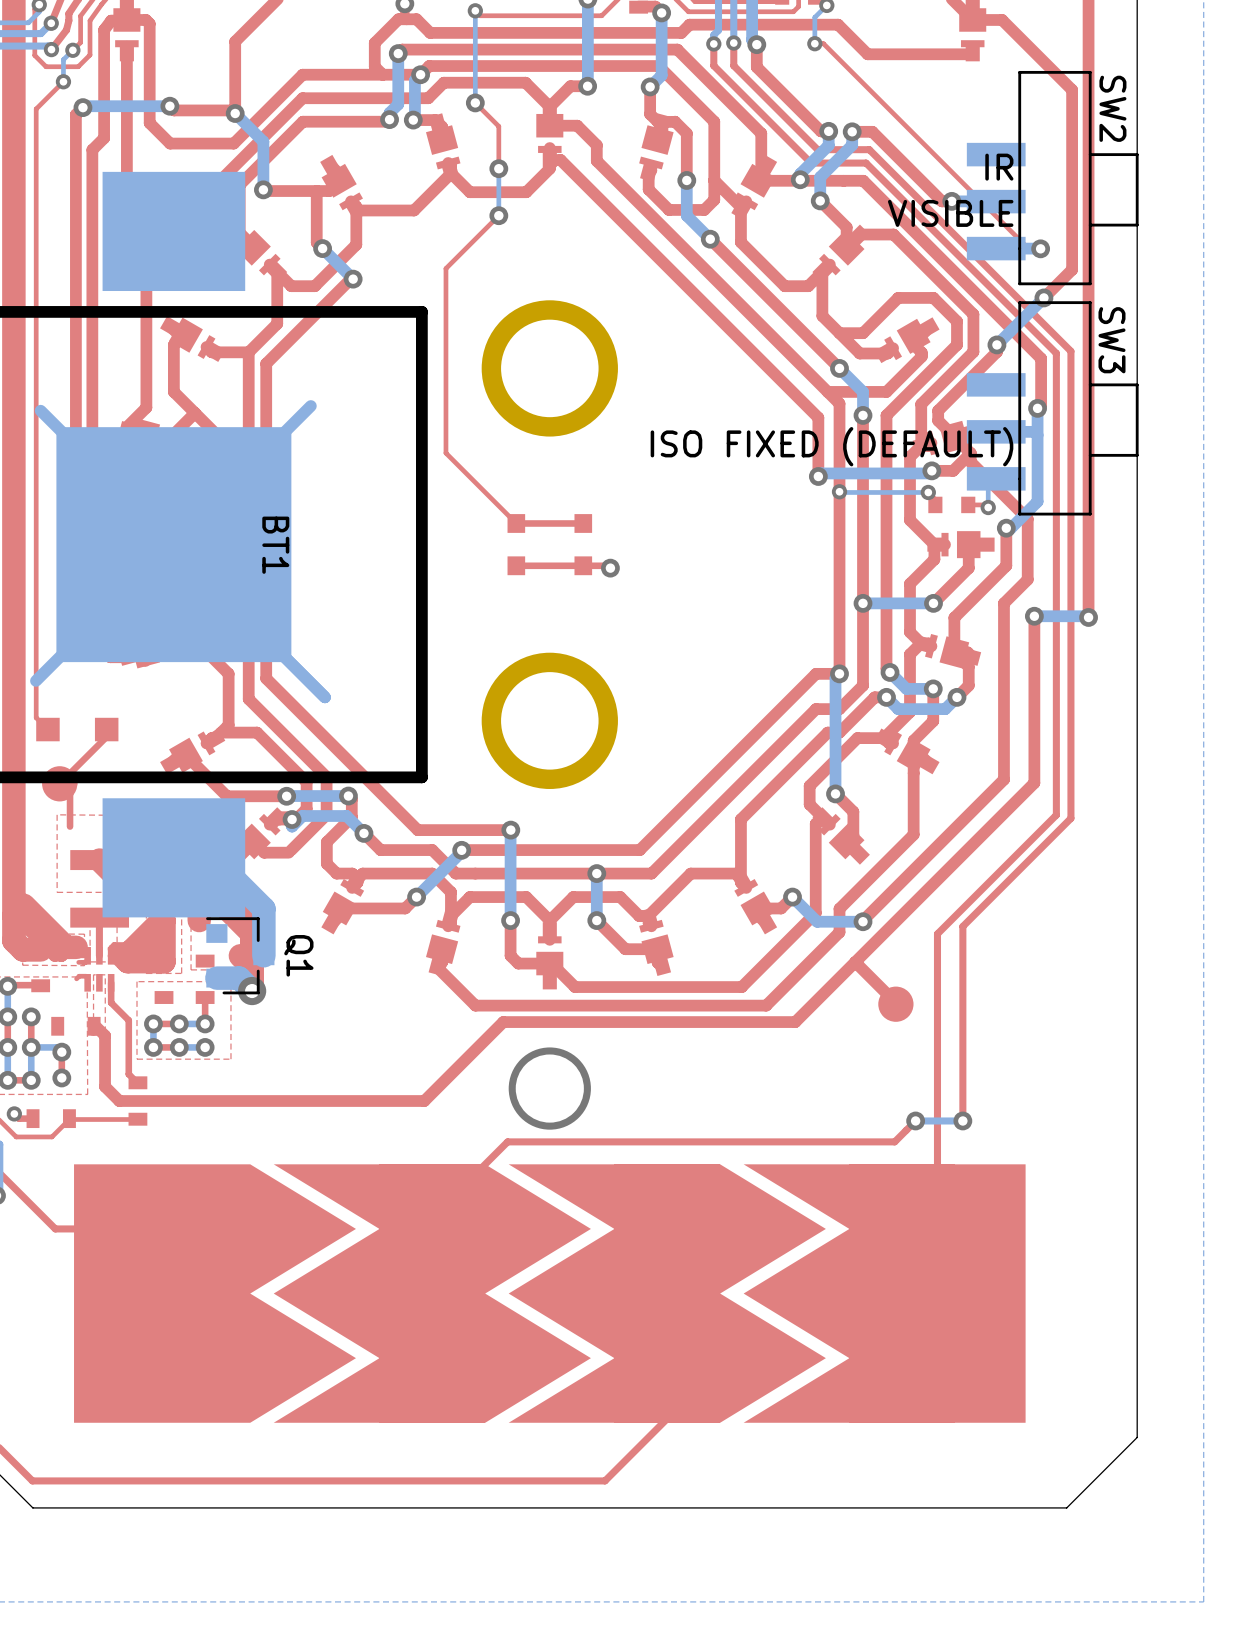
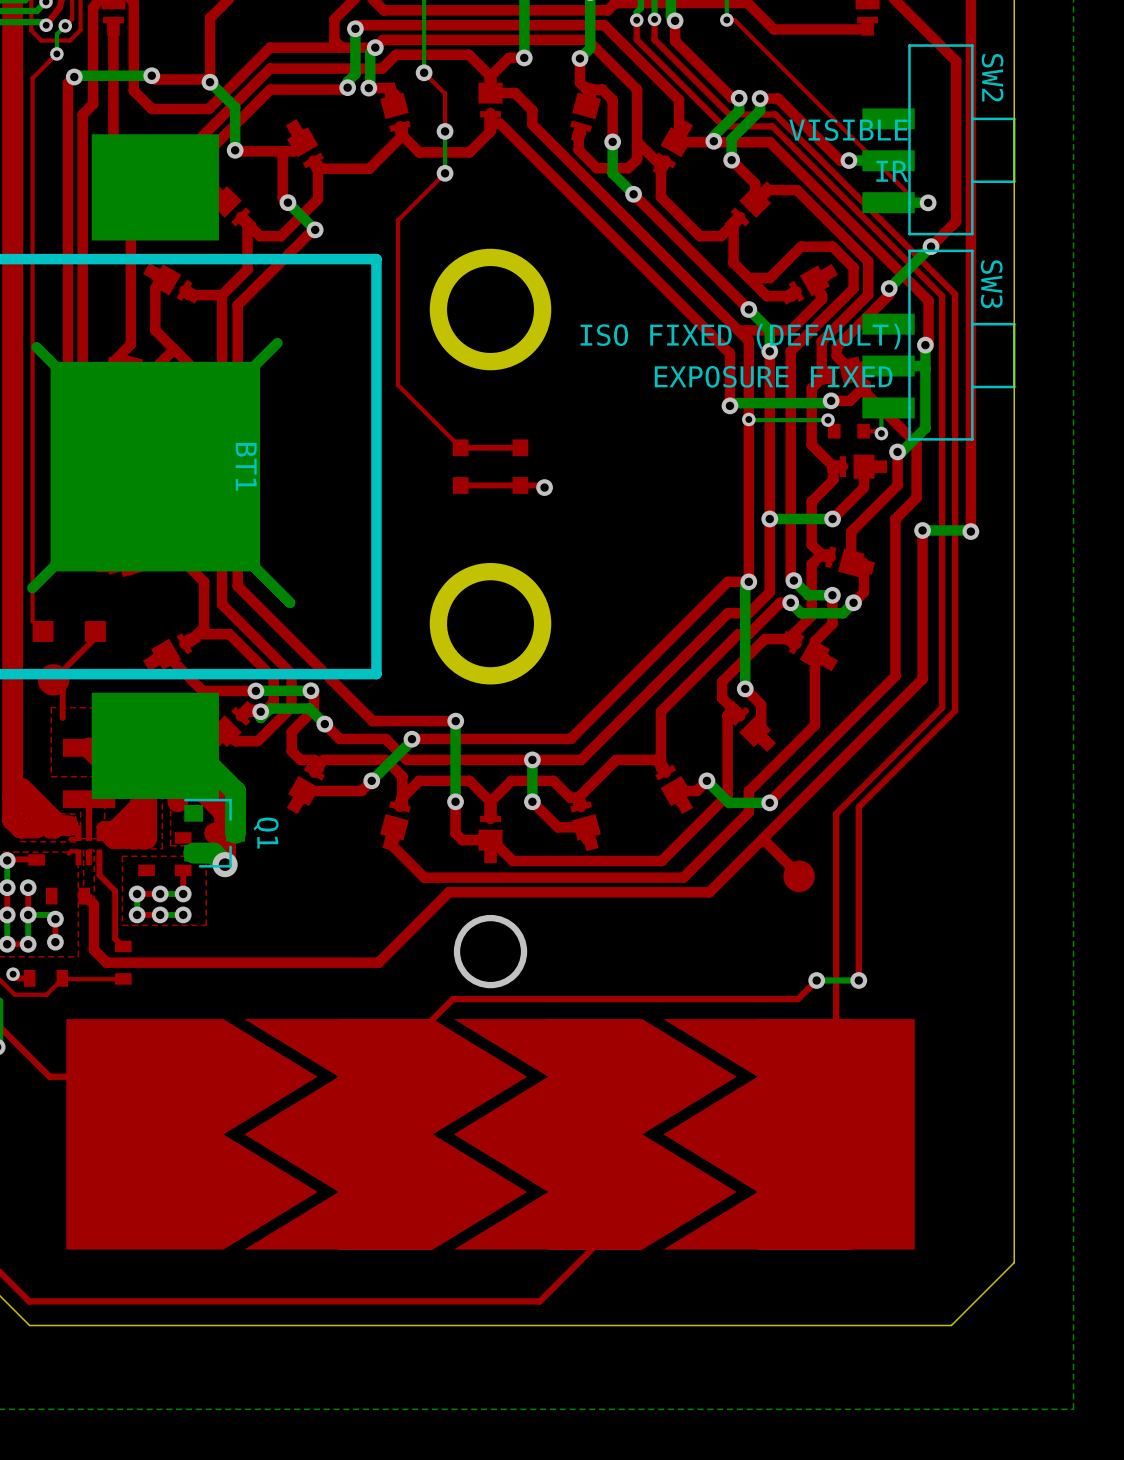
text position: IR (999, 167) -> IR (892, 171)
text position: VISIBLE (950, 213) -> VISIBLE (848, 130)
text: none -> EXPOSURE FIXED (773, 376)
text position: ISO FIXED (DEFAULT) (831, 446) -> ISO FIXED (DEFAULT) (740, 336)

